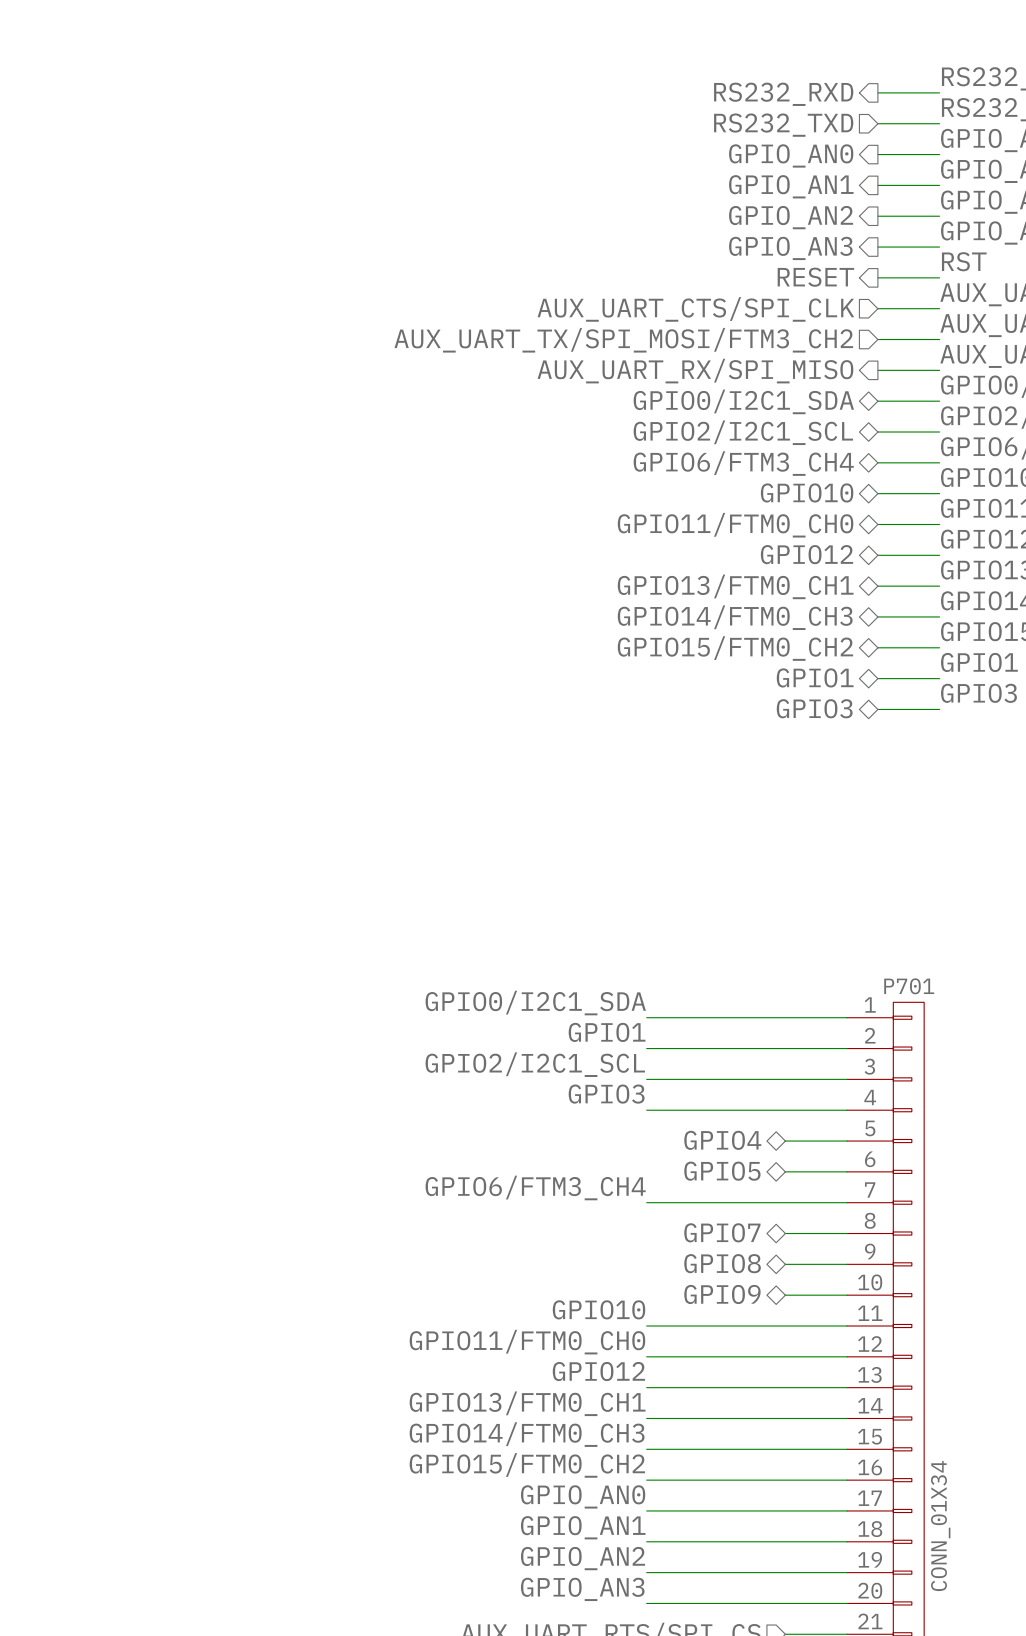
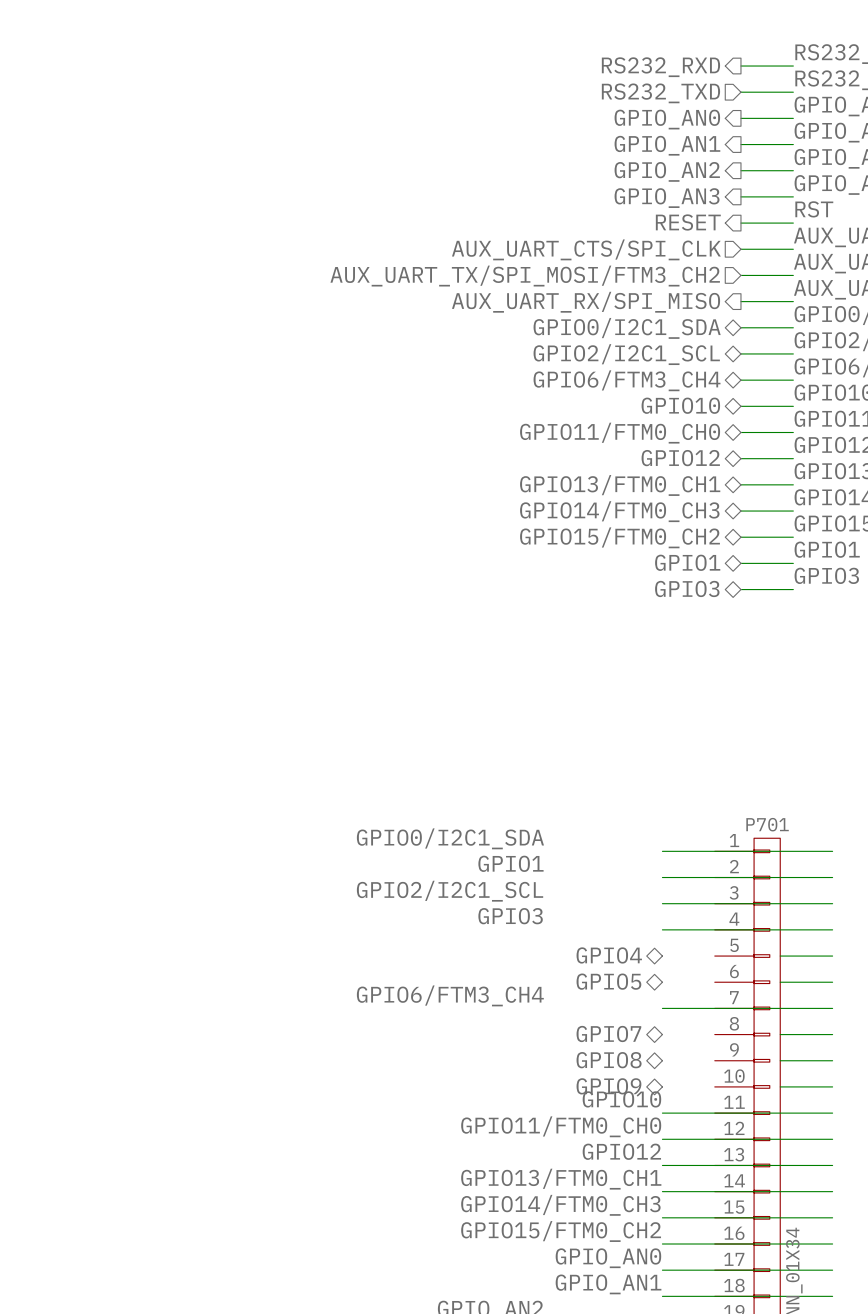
wire: (646, 1017) (785, 1017) -> (714, 851) (832, 851)
wire: (646, 1048) (785, 1048) -> (714, 877) (832, 877)
wire: (646, 1079) (785, 1079) -> (714, 903) (832, 903)
wire: (646, 1110) (785, 1110) -> (714, 929) (832, 929)
wire: (785, 1141) (847, 1141) -> (780, 956) (832, 956)
wire: (785, 1171) (847, 1171) -> (780, 982) (832, 982)
wire: (646, 1202) (785, 1202) -> (714, 1008) (832, 1008)
wire: (785, 1233) (847, 1233) -> (780, 1034) (832, 1034)
wire: (785, 1264) (847, 1264) -> (780, 1060) (832, 1060)
wire: (785, 1295) (847, 1295) -> (780, 1086) (832, 1086)
label position: GPIO10 (599, 1309) -> GPIO10 (621, 1099)
wire: (646, 1326) (785, 1326) -> (714, 1113) (832, 1113)
label position: GPIO11/FTM0_CH0 (527, 1342) -> GPIO11/FTM0_CH0 (561, 1126)
wire: (646, 1356) (785, 1356) -> (714, 1139) (832, 1139)
label position: GPIO12 (598, 1371) -> GPIO12 (621, 1151)
wire: (646, 1387) (785, 1387) -> (714, 1165) (832, 1165)
label position: GPIO13/FTM0_CH1 (527, 1403) -> GPIO13/FTM0_CH1 (561, 1179)
wire: (646, 1418) (785, 1418) -> (714, 1191) (832, 1191)
label position: GPIO14/FTM0_CH3 (527, 1434) -> GPIO14/FTM0_CH3 (560, 1205)
wire: (646, 1449) (785, 1449) -> (714, 1217) (832, 1217)
label position: GPIO15/FTM0_CH2 (527, 1465) -> GPIO15/FTM0_CH2 (561, 1231)
wire: (646, 1480) (785, 1480) -> (714, 1244) (832, 1244)
label position: GPIO_AN0 (583, 1496) -> GPIO_AN0 (608, 1258)
wire: (646, 1510) (785, 1510) -> (714, 1270) (832, 1270)
label position: GPIO_AN1 (583, 1527) -> GPIO_AN1 (608, 1284)
wire: (646, 1541) (785, 1541) -> (714, 1296) (832, 1296)

